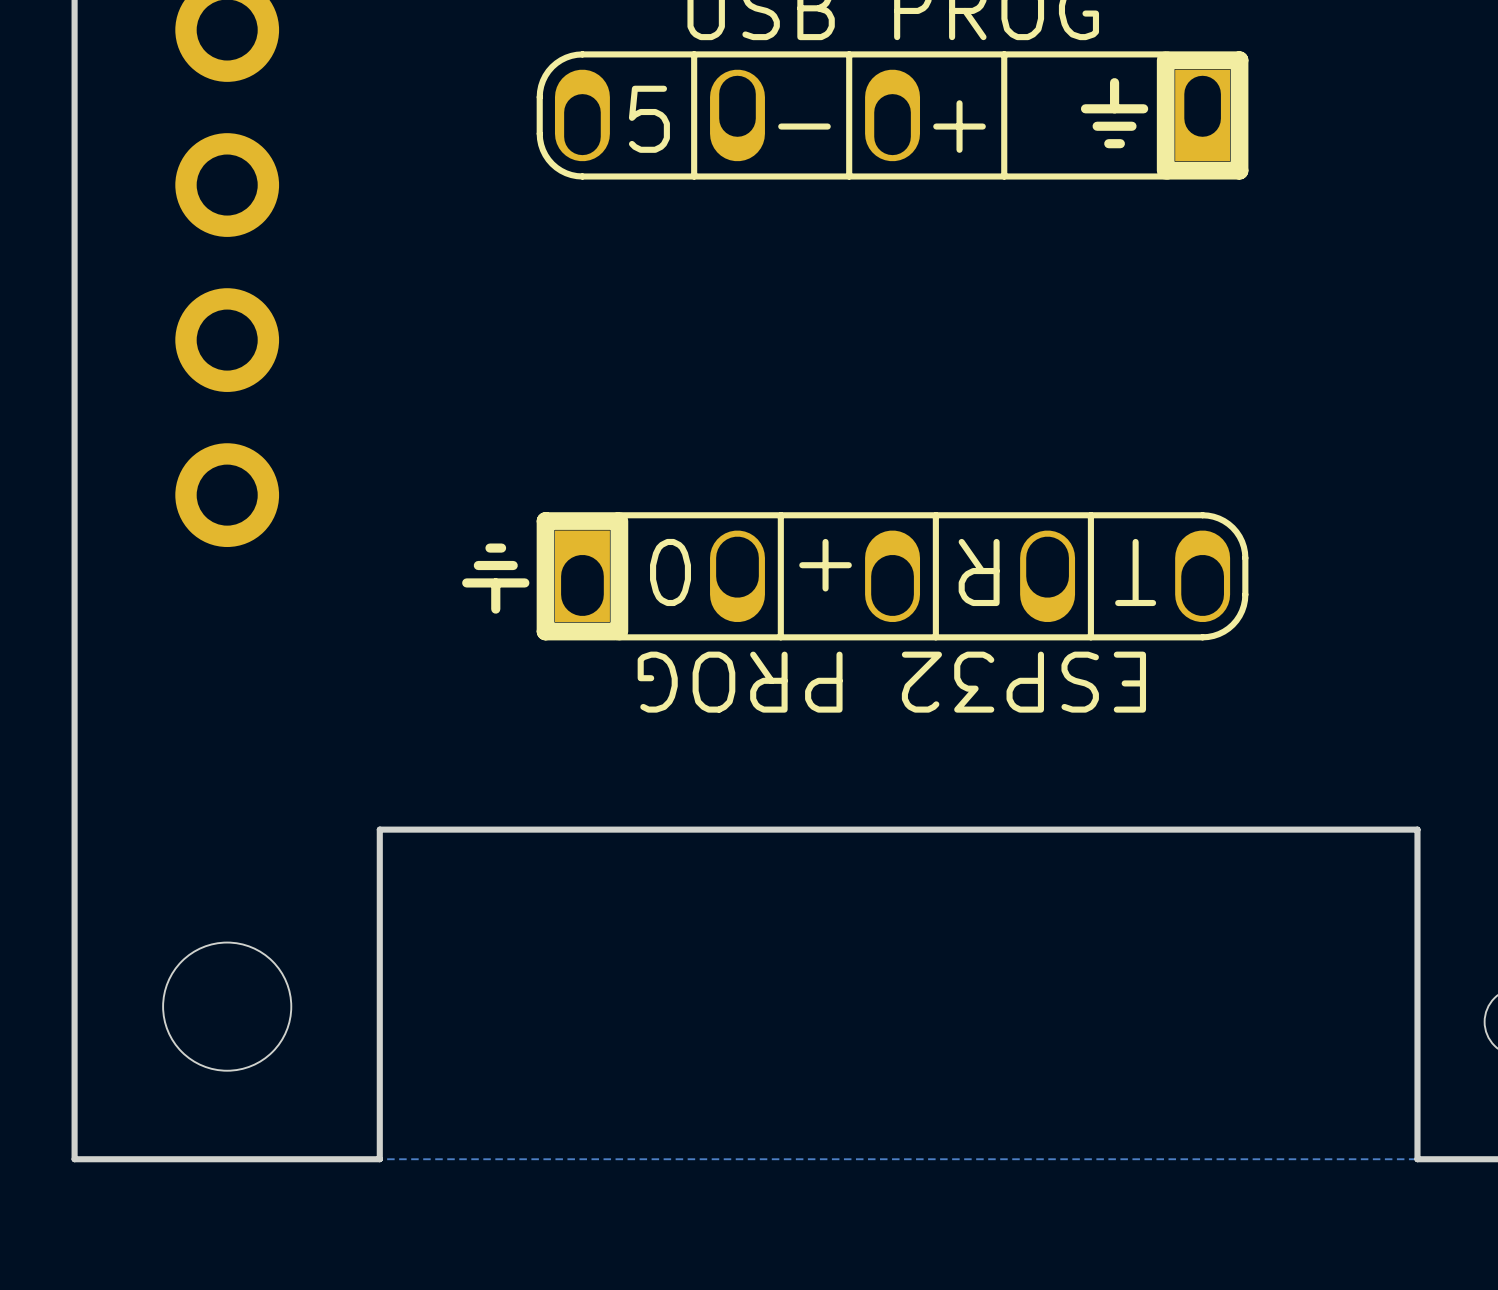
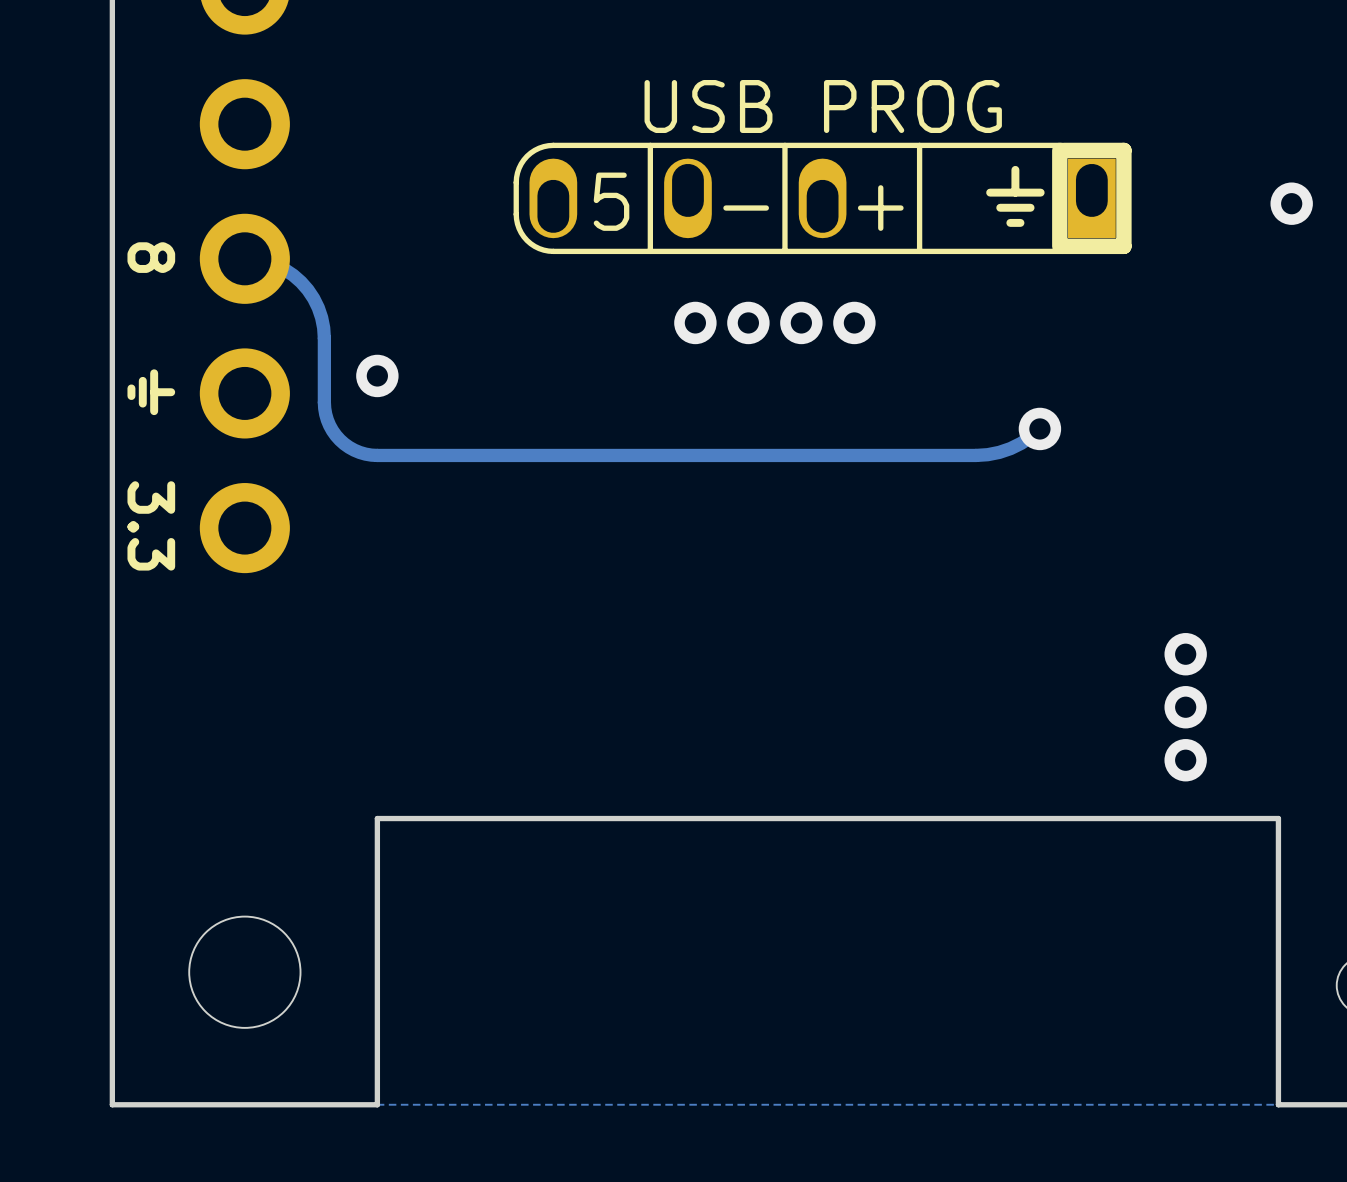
via: none -> (1291, 203)
text: none -> 8 (151, 257)
track: none -> (244, 258) (265, 261) (284, 269) (301, 282) (313, 298) (323, 327) (324, 402) (327, 419) (339, 439) (349, 447) (365, 454) (975, 455) (999, 452) (1010, 448) (1031, 436) (1039, 428)
via: none -> (695, 322)
via: none -> (748, 322)
via: none -> (801, 322)
via: none -> (854, 322)
via: none -> (377, 375)
text: none -> ⏚ (151, 392)
via: none -> (1039, 428)
text: none -> 3.3 (151, 525)
part: (892, 576) -> none
via: none -> (1185, 654)
via: none -> (1185, 707)
via: none -> (1185, 760)

